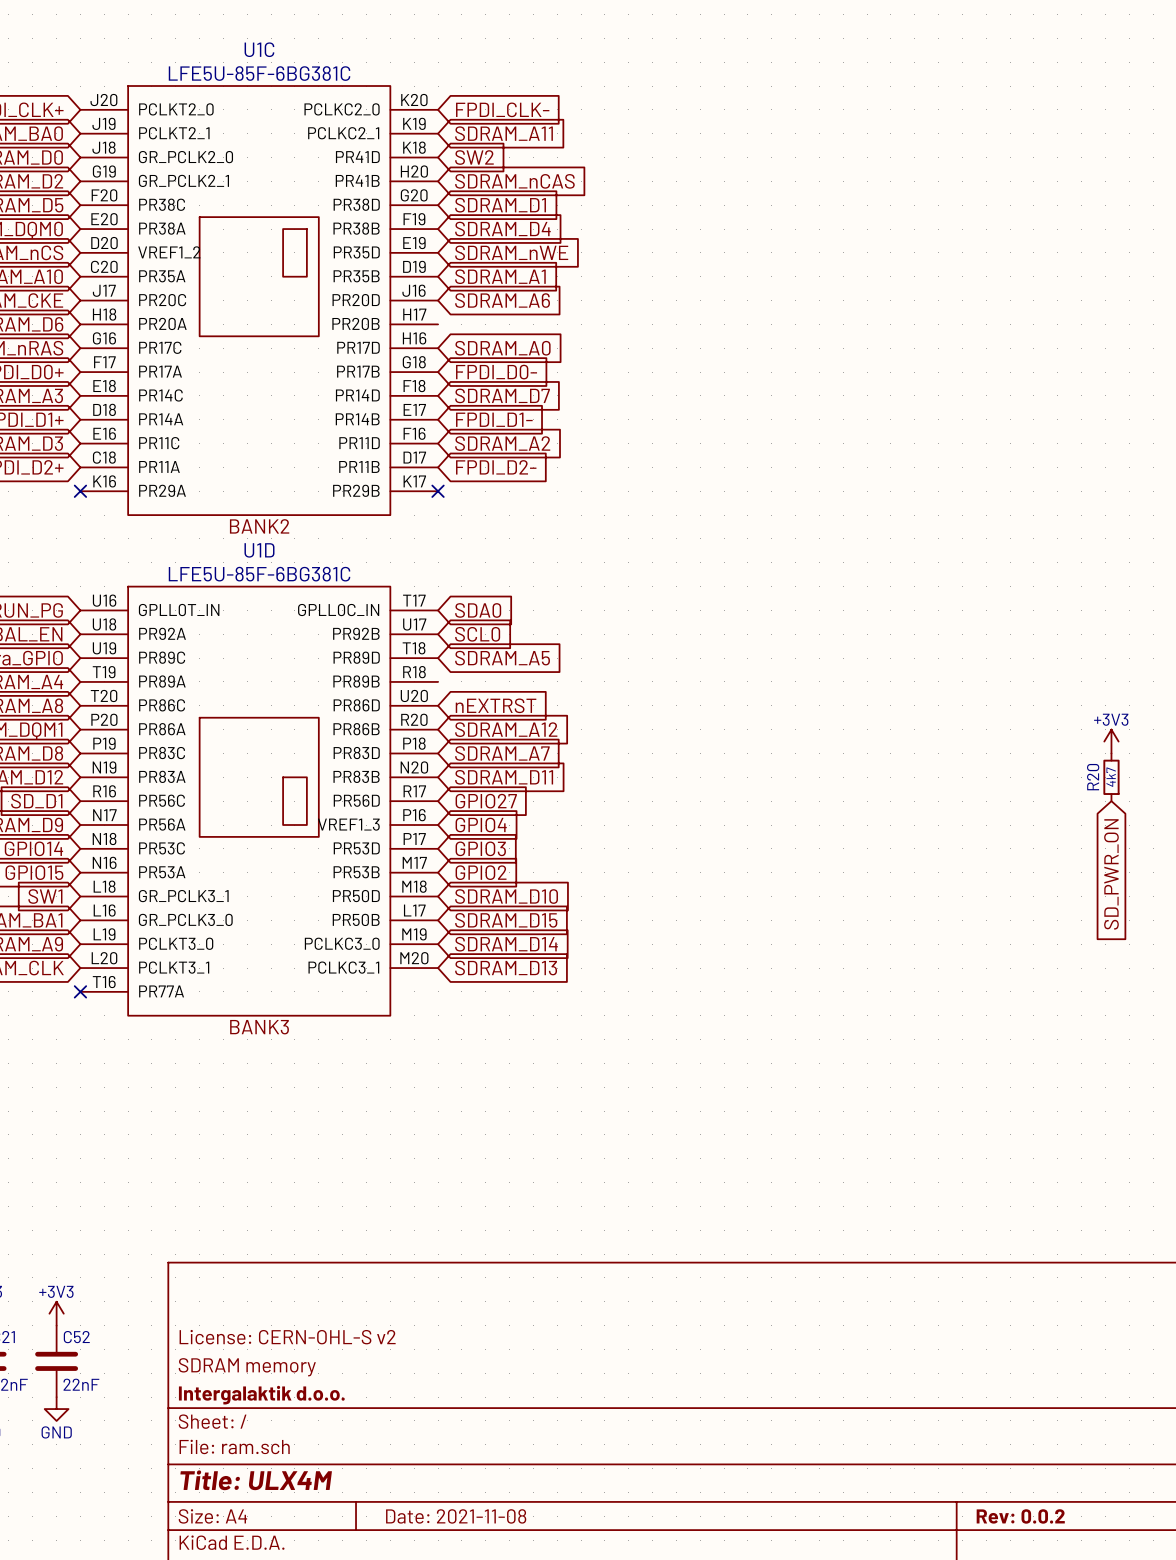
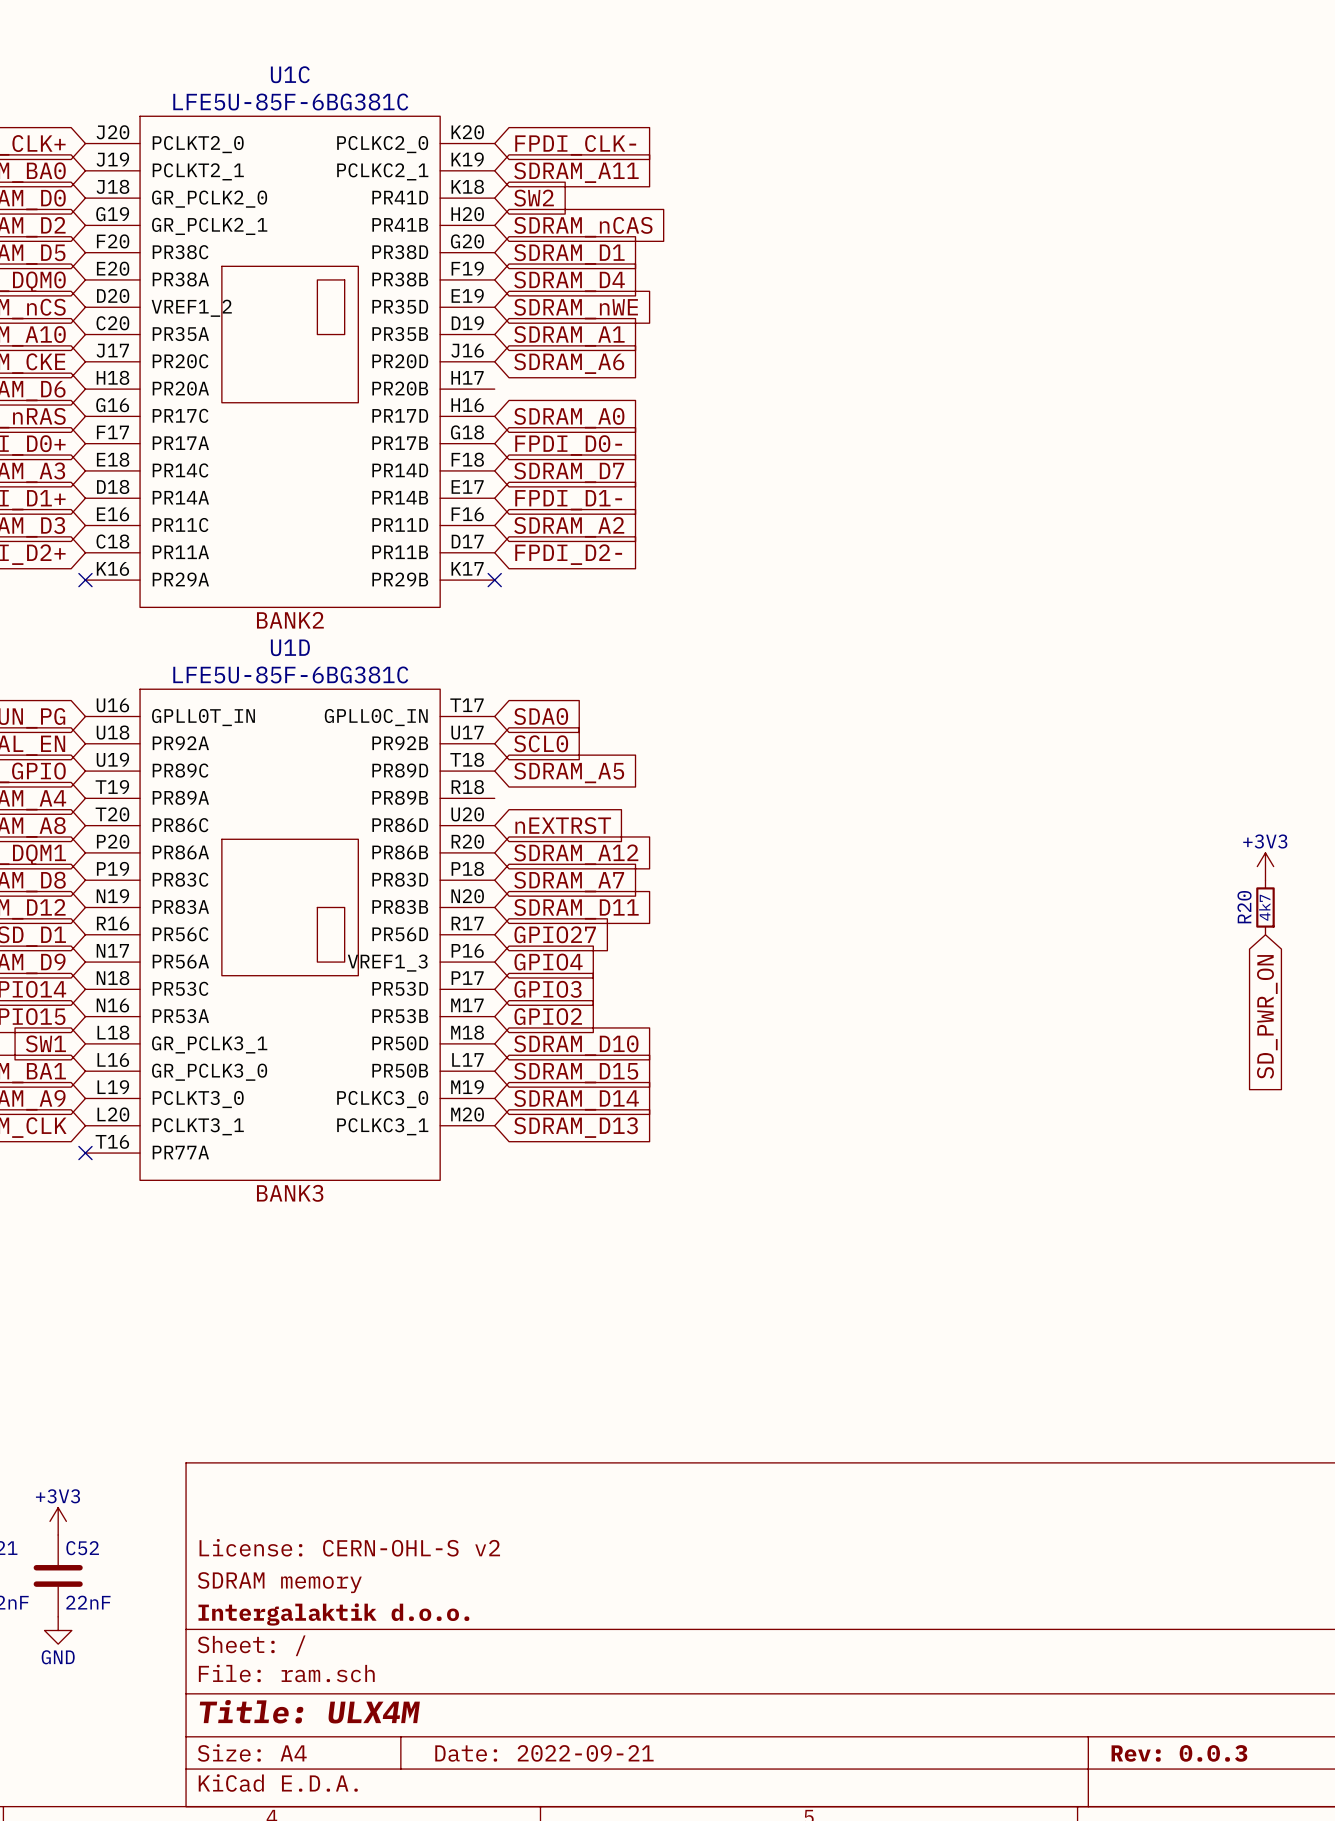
title block: Date: 2021-11-08 (456, 1516) -> Date: 2022-09-21 (544, 1753)
title block: Rev: 0.0.2 (1020, 1516) -> Rev: 0.0.3 (1179, 1753)

